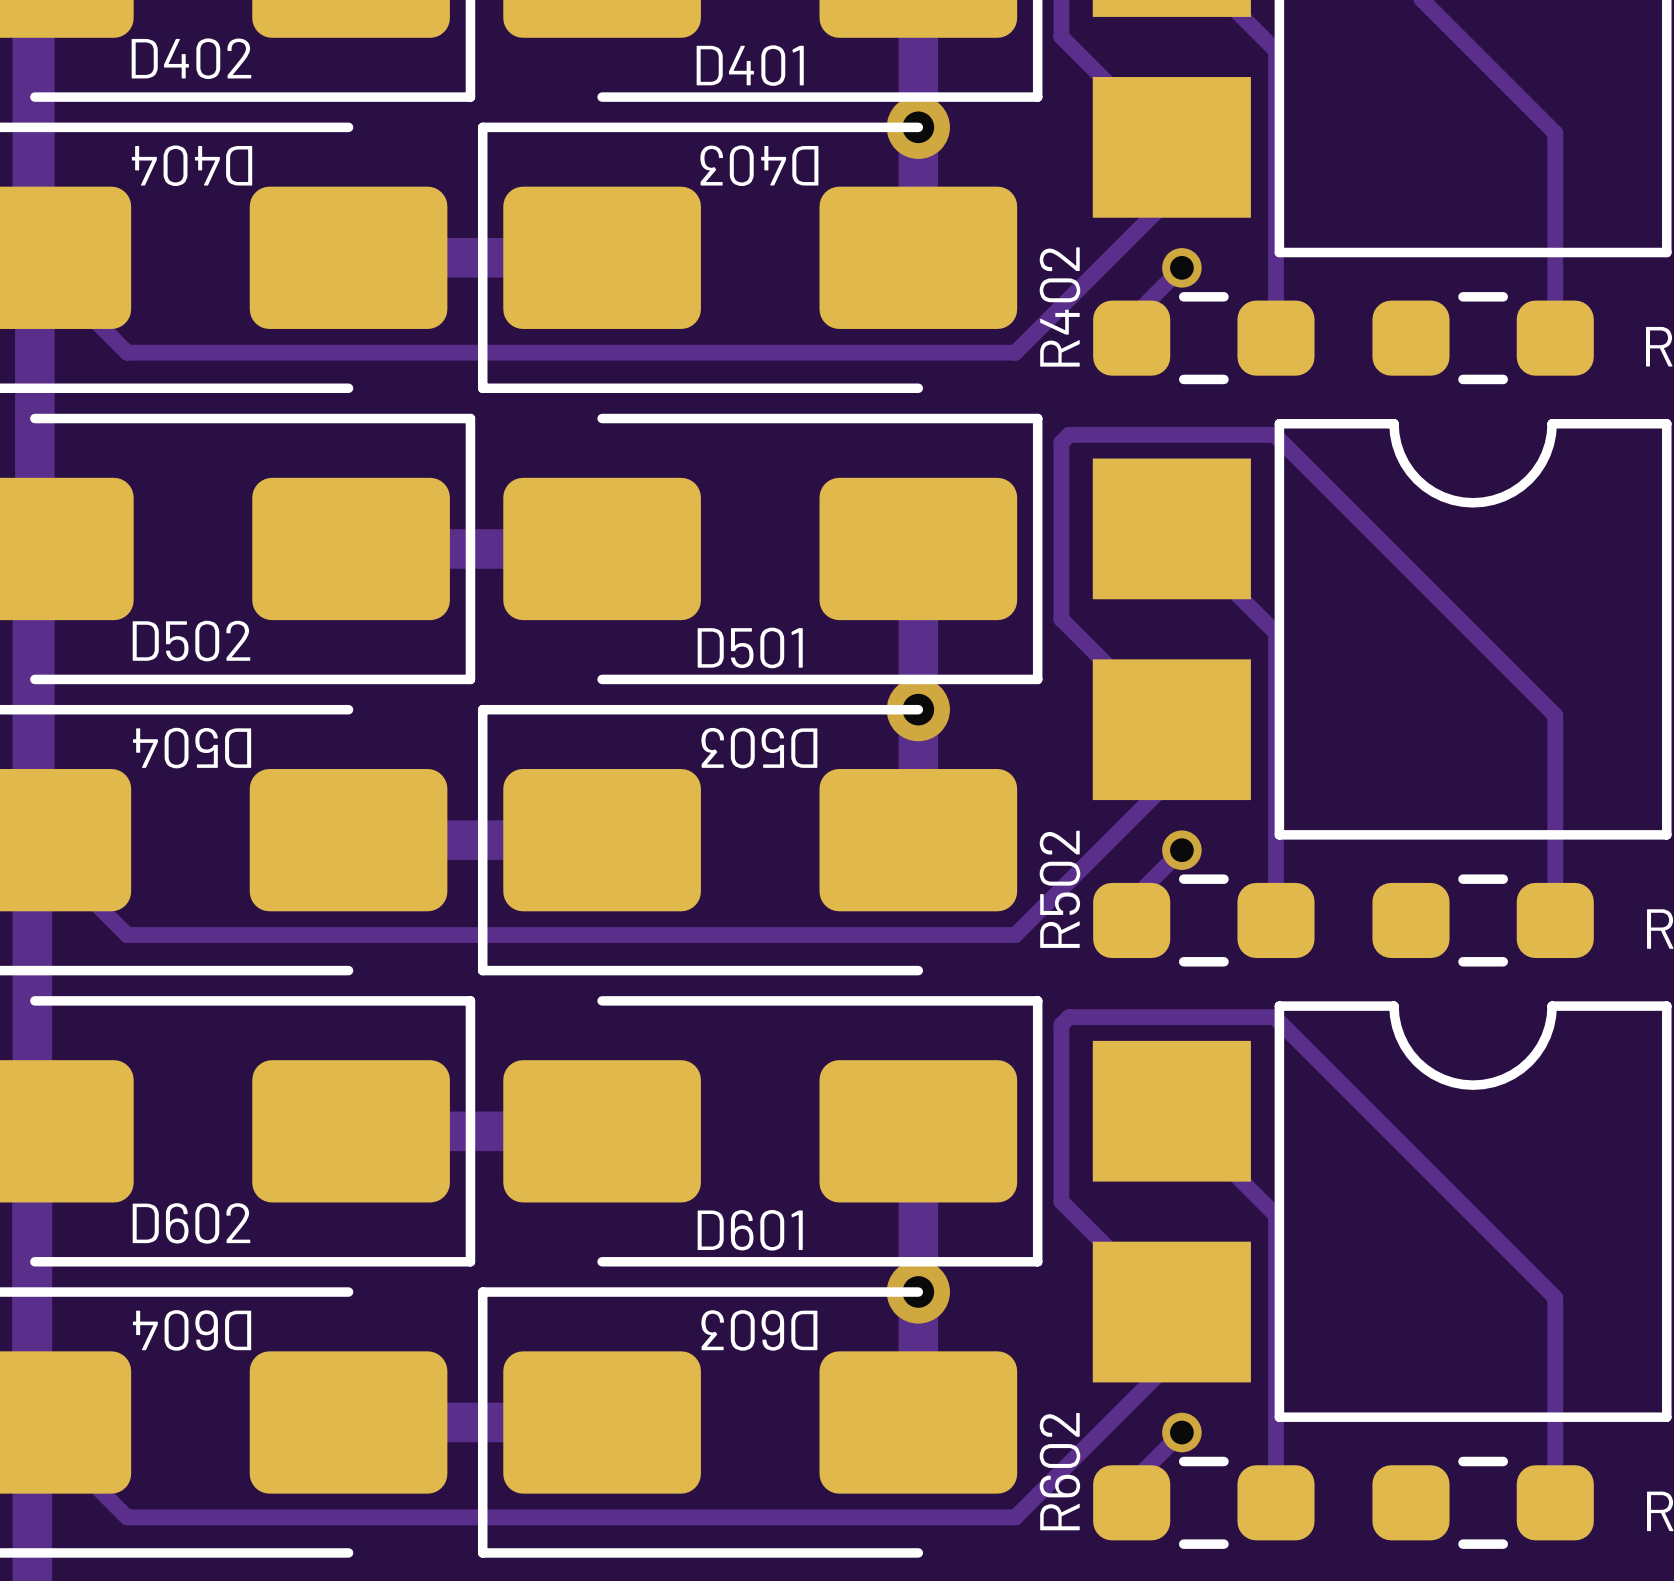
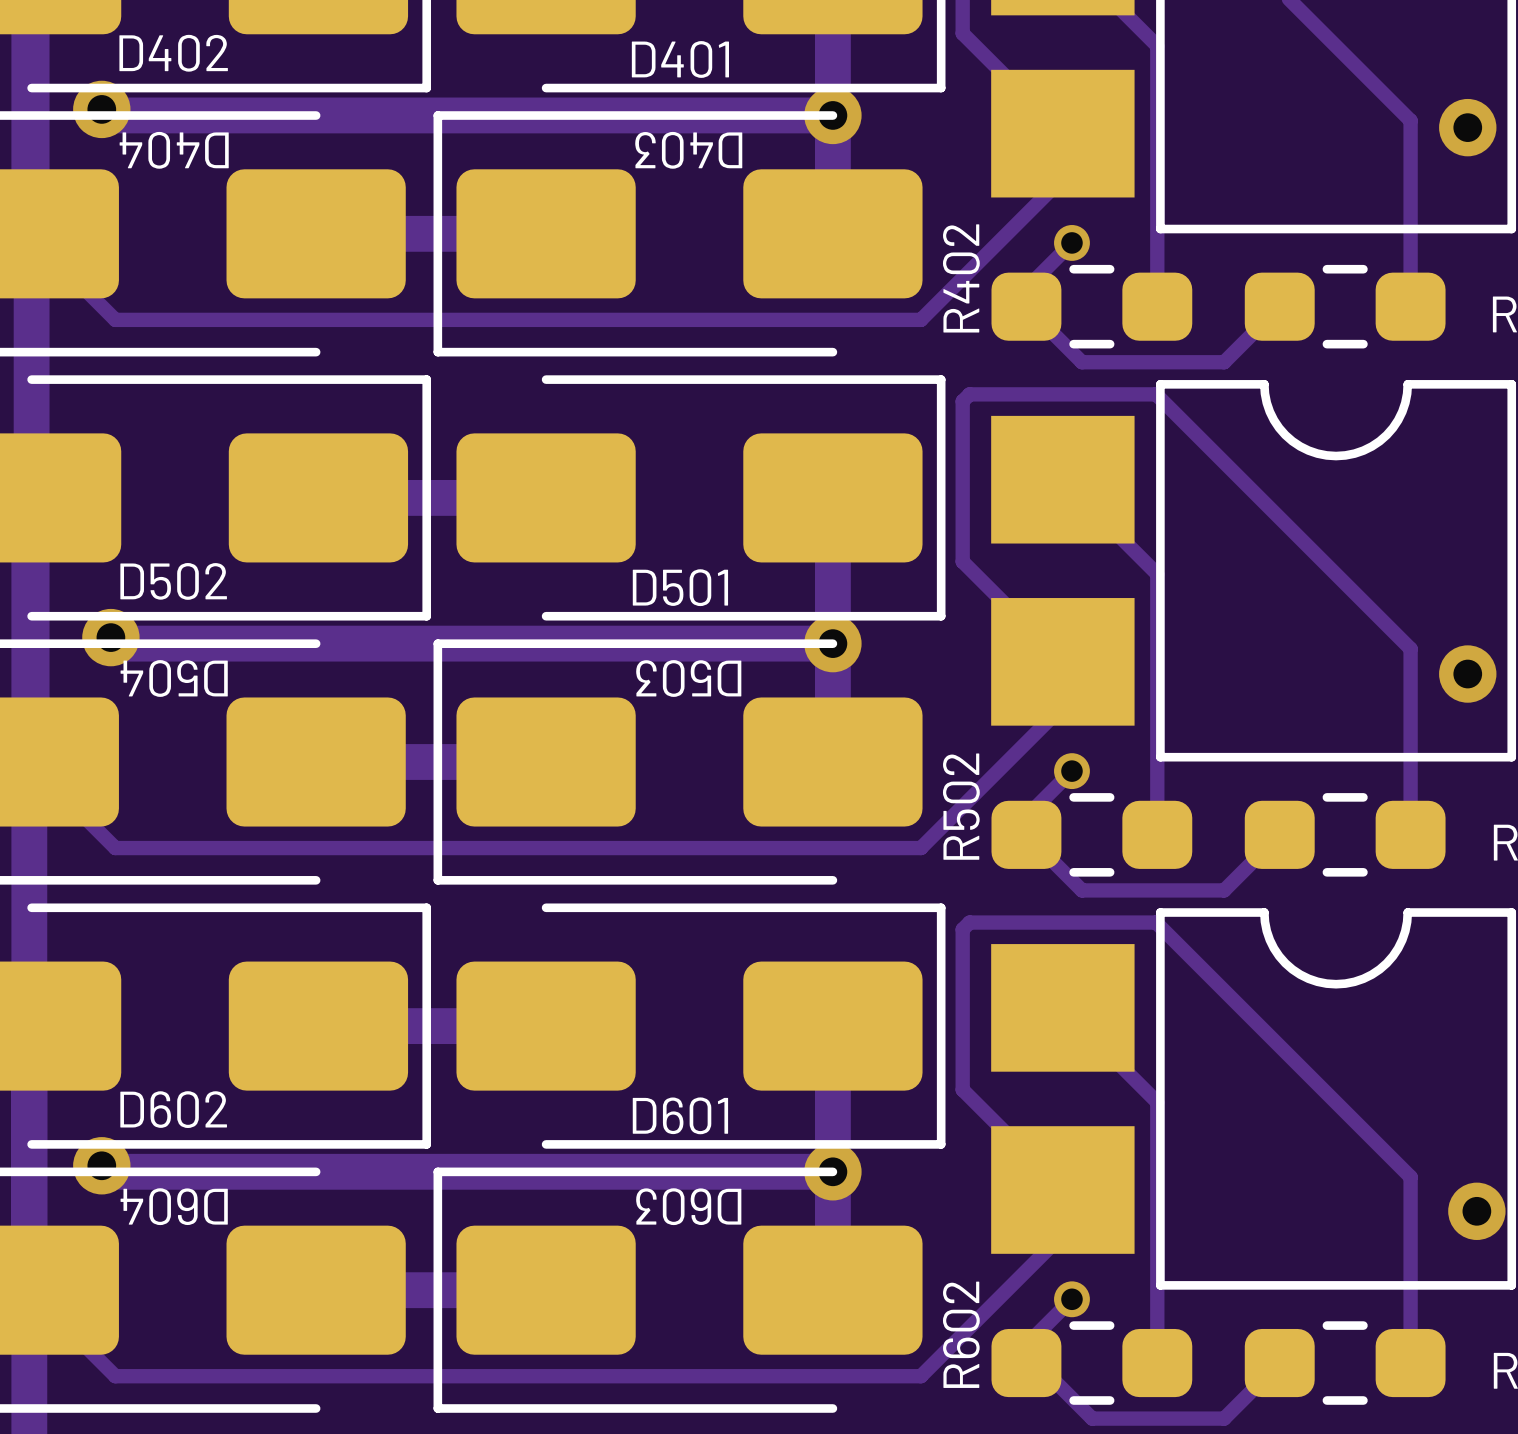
track: none -> (101, 109) (107, 115) (832, 115)
via: none -> (101, 109)
via: none -> (1467, 127)
track: none -> (1026, 306) (1082, 362) (1224, 362) (1279, 306)
track: none -> (110, 637) (116, 643) (832, 643)
via: none -> (110, 637)
via: none -> (1467, 674)
track: none -> (1026, 834) (1082, 890) (1224, 890) (1279, 834)
track: none -> (101, 1165) (107, 1171) (832, 1171)
via: none -> (101, 1165)
via: none -> (1476, 1211)
track: none -> (1026, 1363) (1036, 1363) (1092, 1418) (1224, 1418) (1279, 1363)

